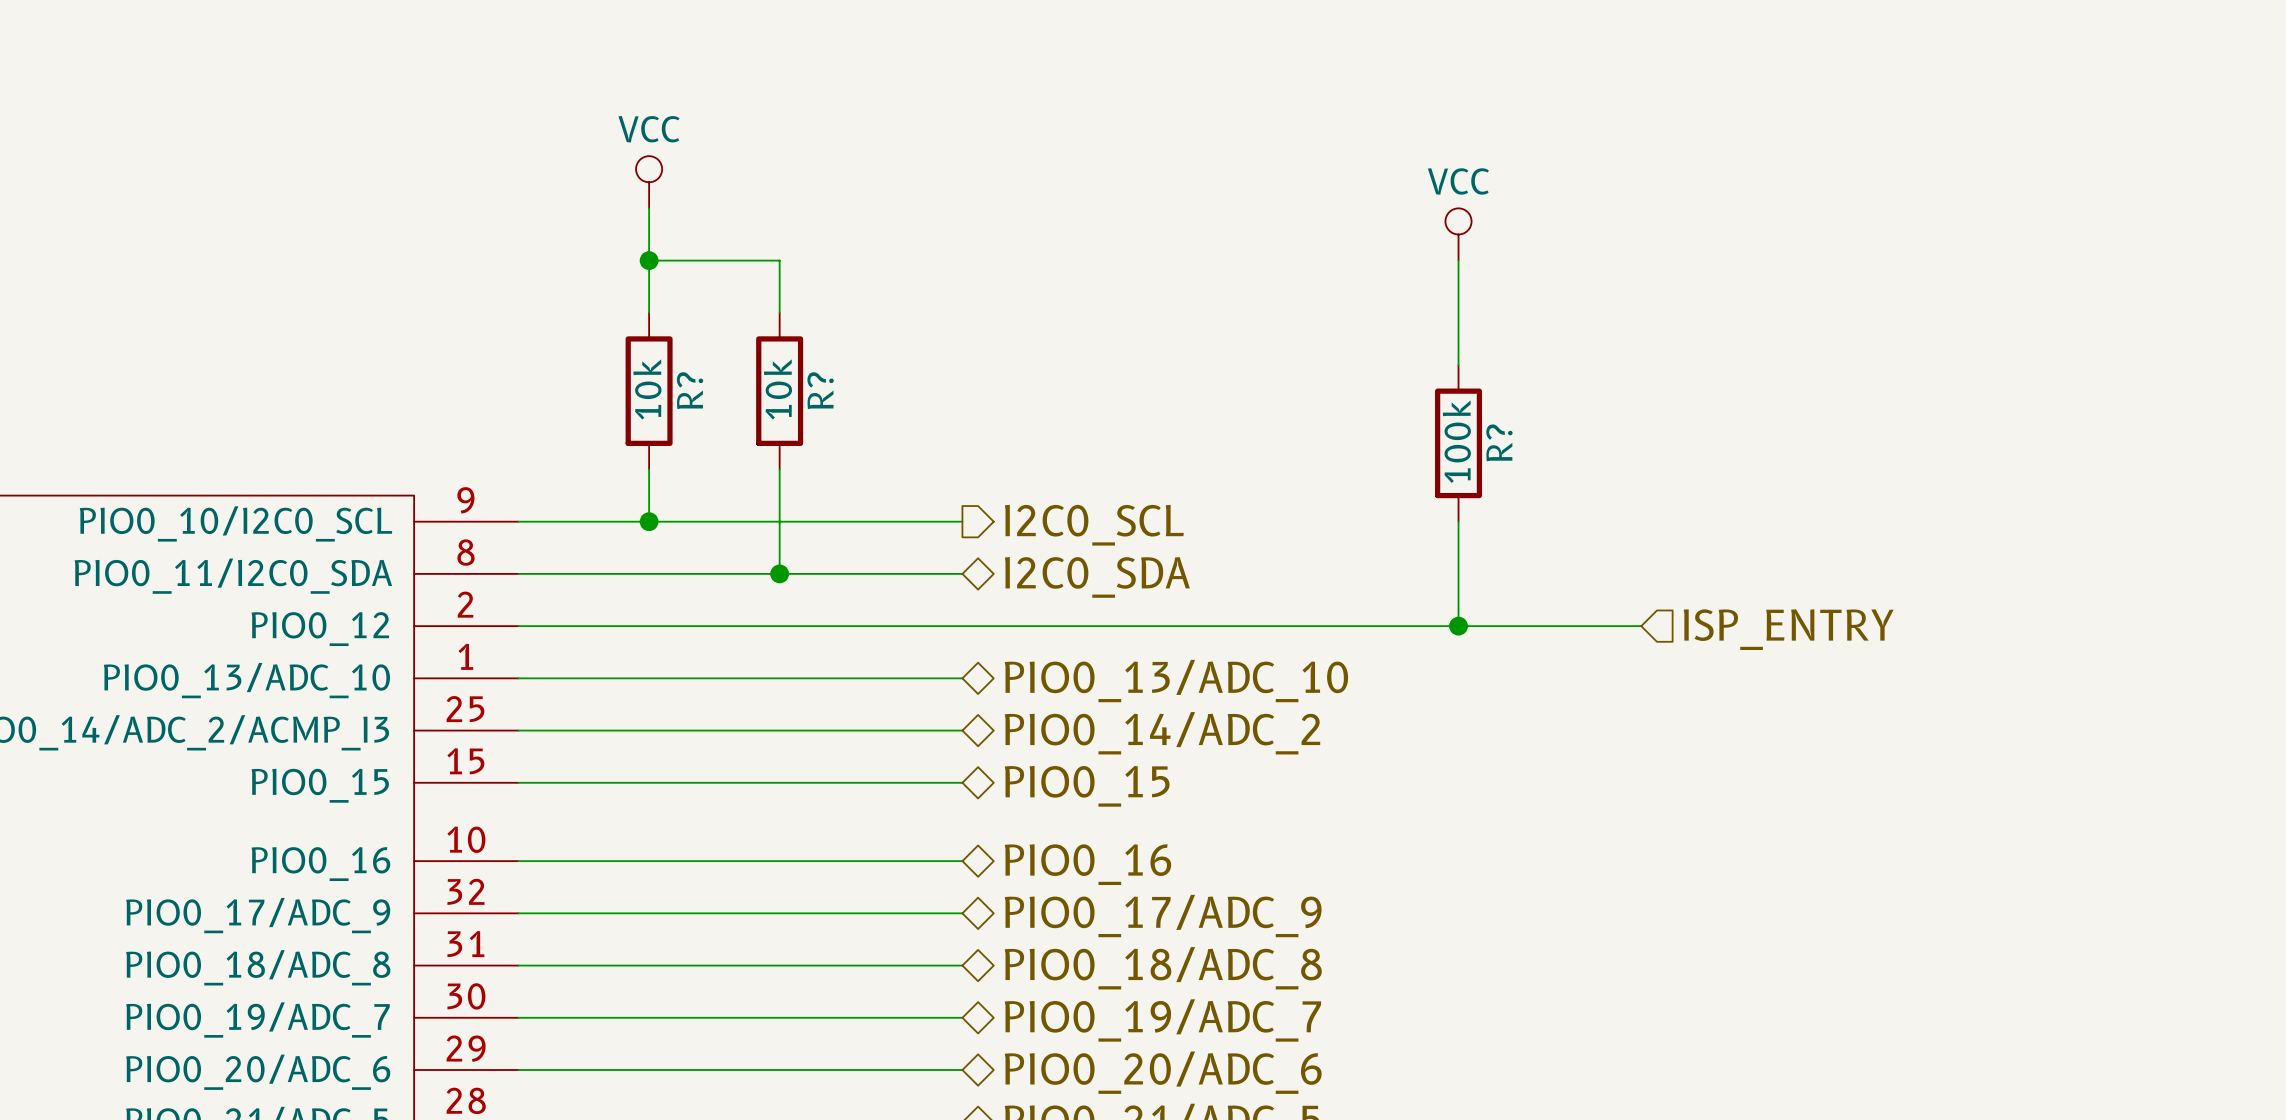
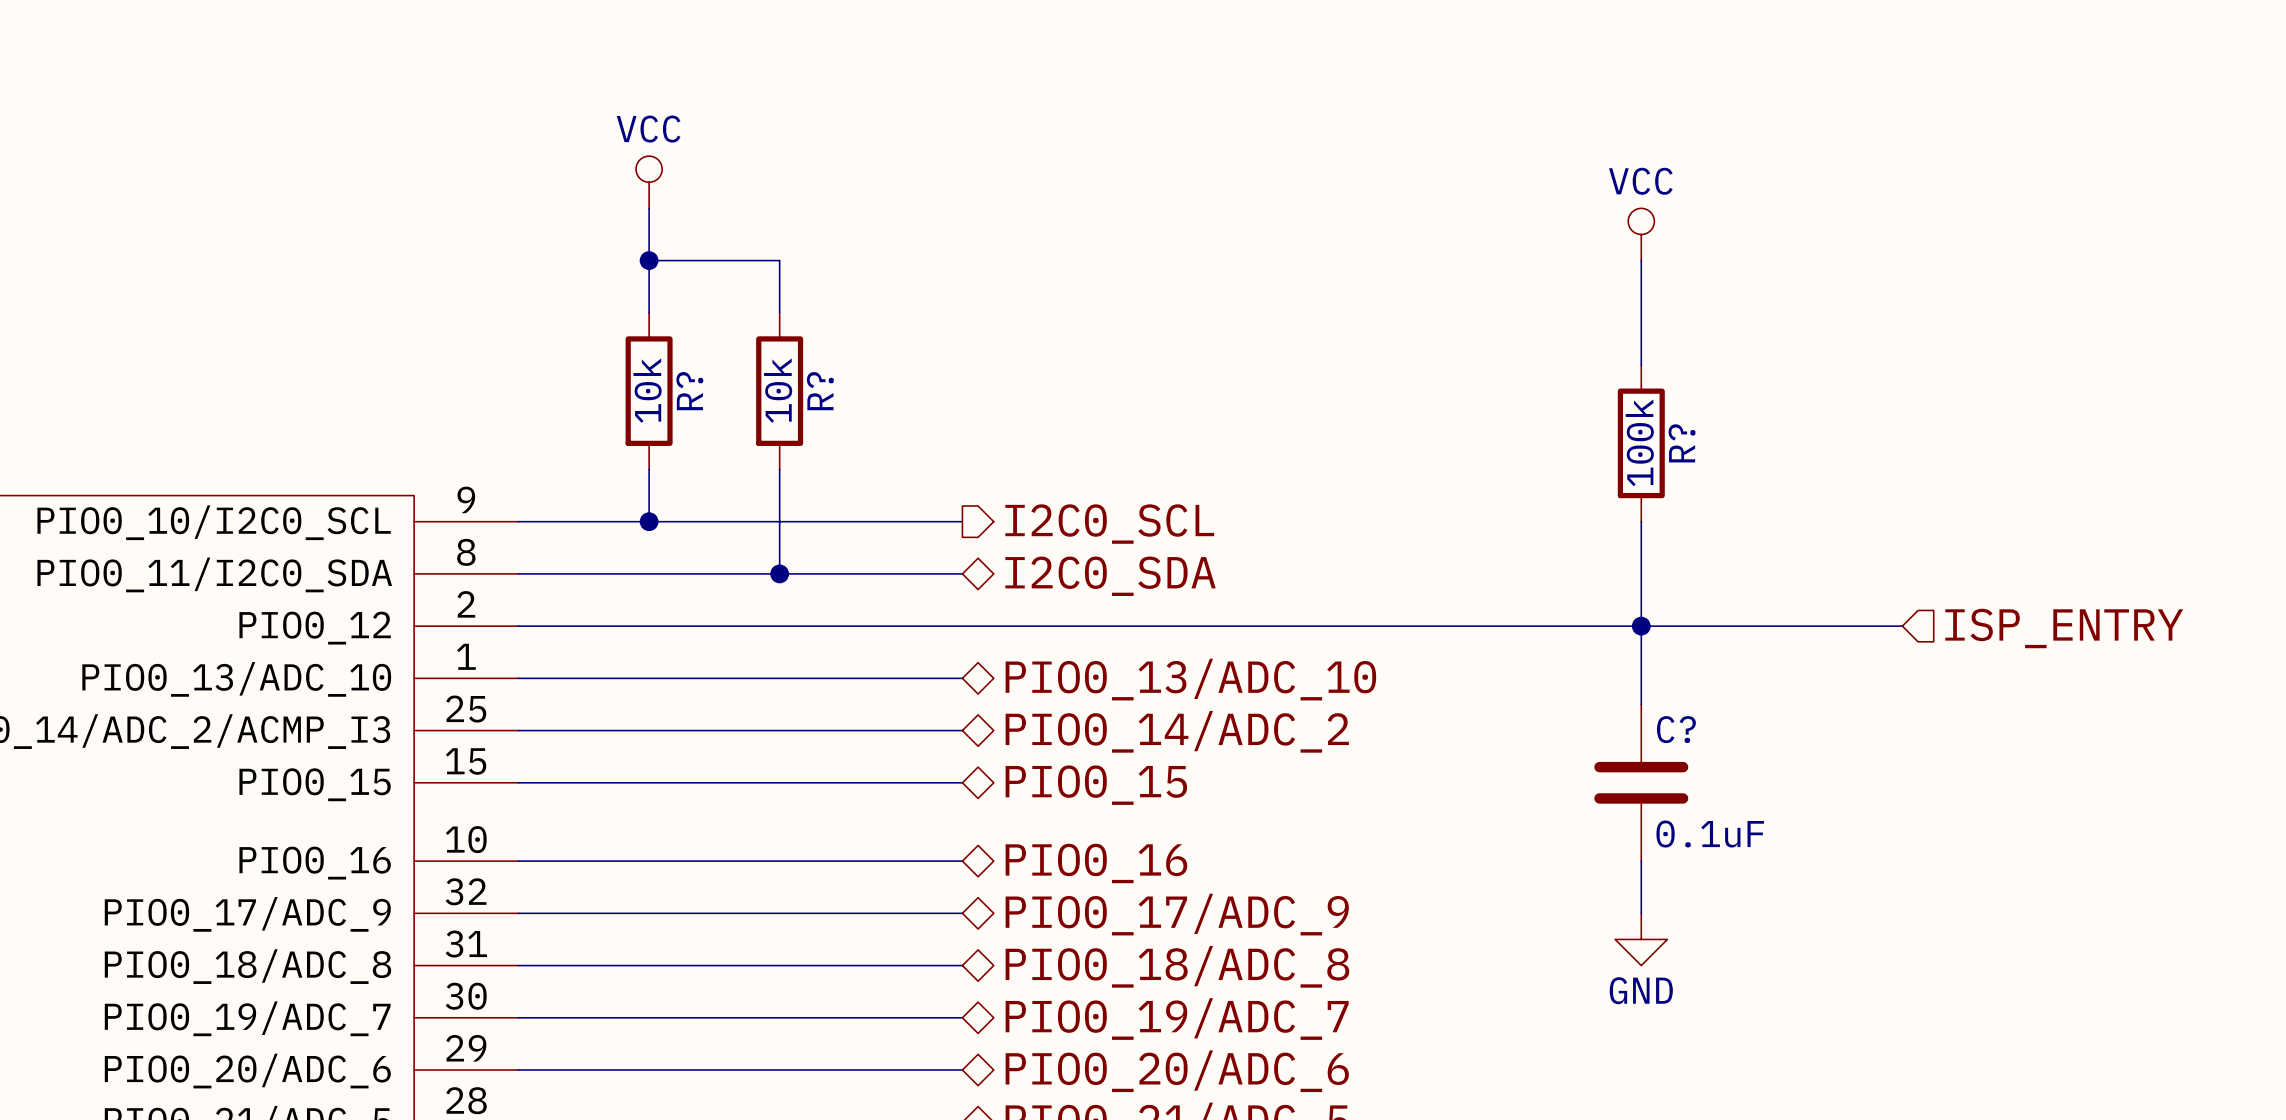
power symbol position: VCC (1458, 234) -> VCC (1641, 234)
wire: (1458, 260) (1458, 365) -> (1641, 260) (1641, 365)
R? position: (1458, 443) -> (1641, 443)
wire: (1458, 521) (1458, 626) -> none
wire: none -> (1641, 521) (1641, 704)
junction: (1458, 626) -> none
wire: none -> (1641, 626) (1902, 626)
junction: none -> (1641, 626)
hierarchical label position: ISP_ENTRY (1788, 629) -> ISP_ENTRY (2064, 628)
C?: none -> 0.1uF (1641, 782)
wire: none -> (1641, 861) (1641, 913)
power symbol: none -> GND (1641, 939)

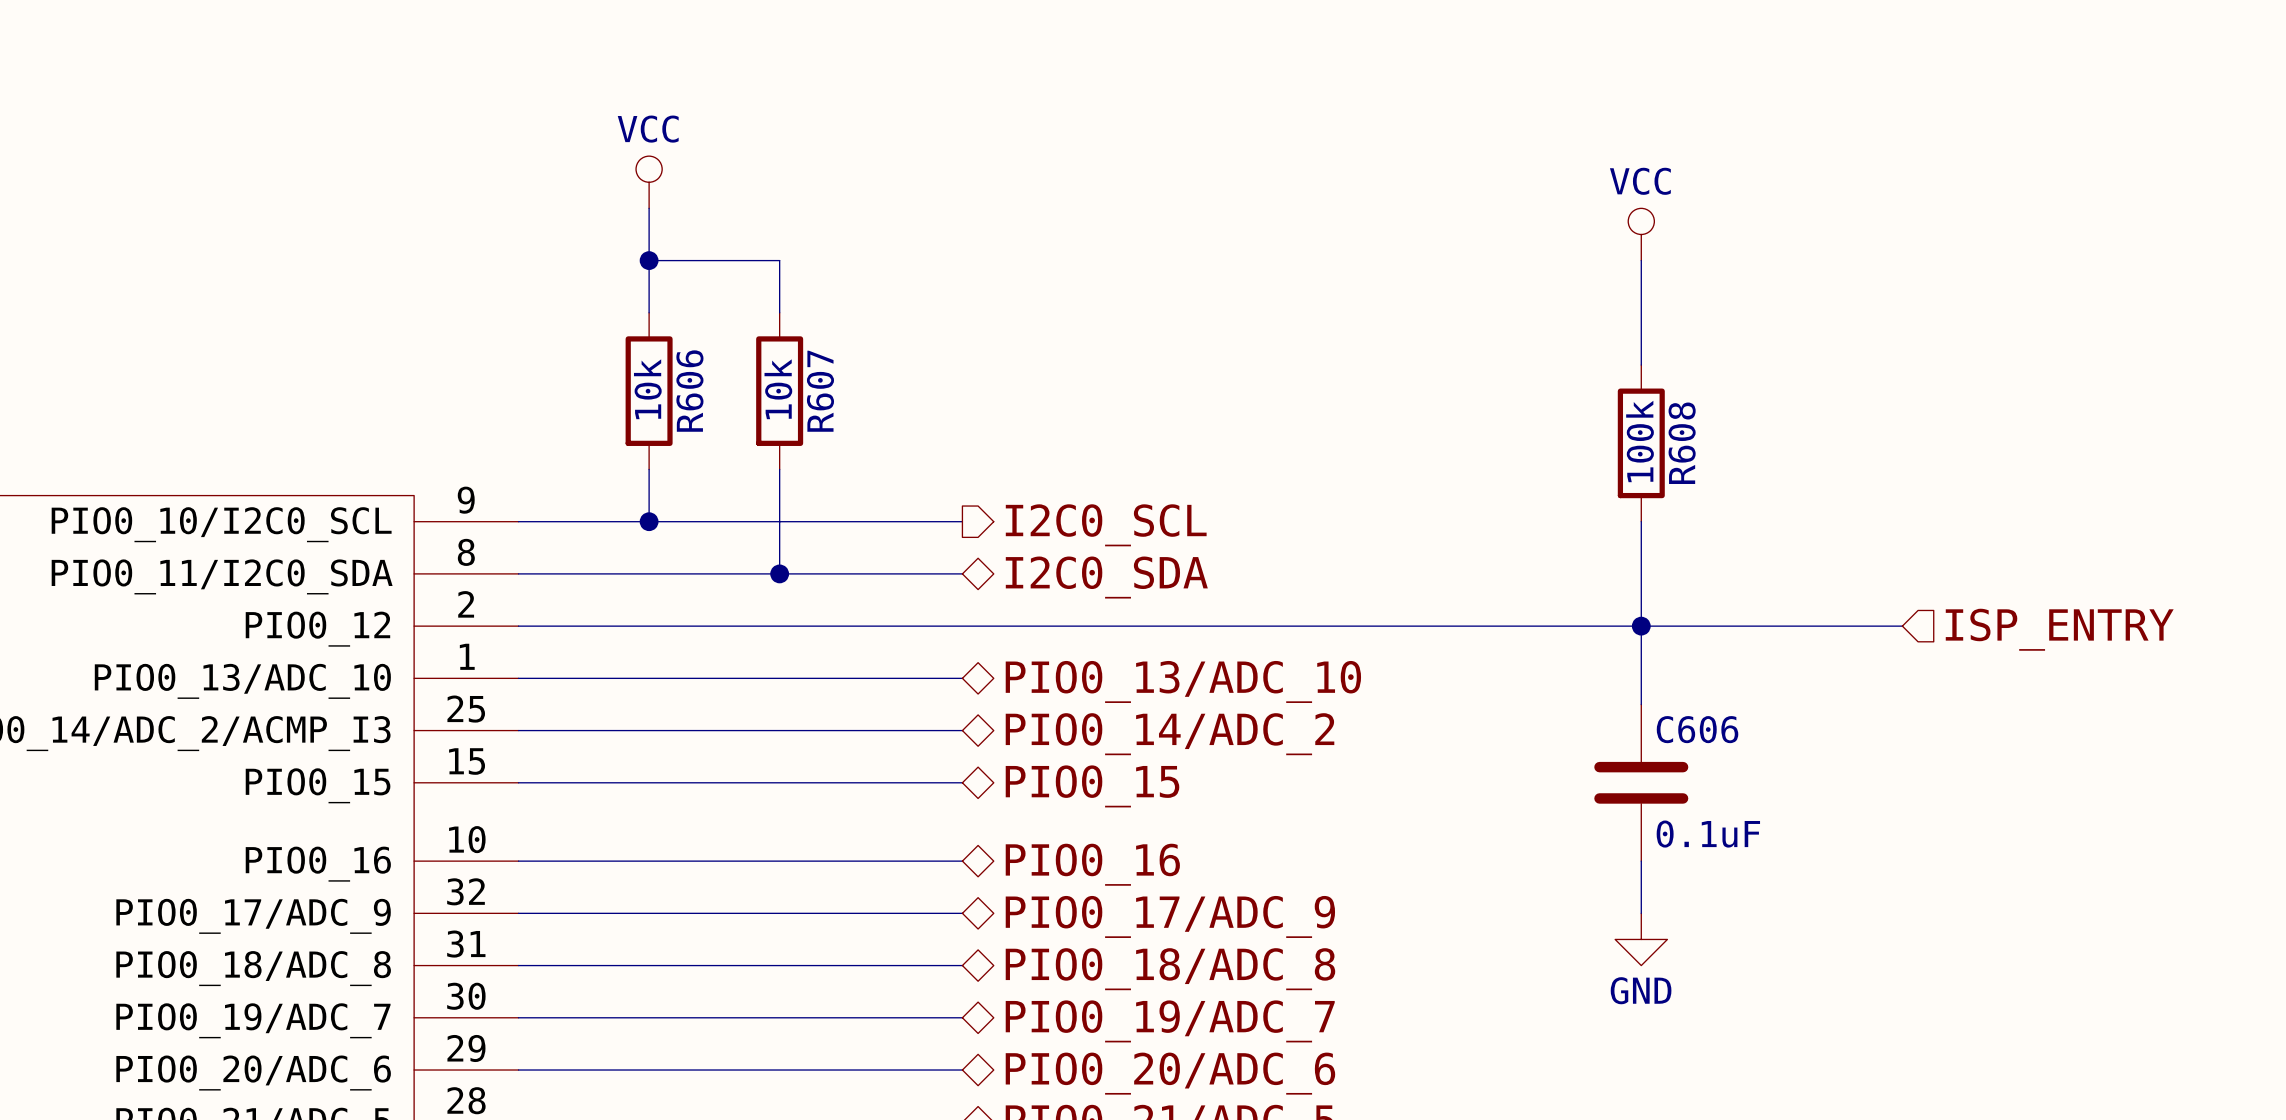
R? name: R? (689, 391) -> R606 (689, 391)
R? name: R? (820, 391) -> R607 (820, 391)
R? name: R? (1682, 443) -> R608 (1682, 443)
C? name: C? (1676, 729) -> C606 (1697, 729)

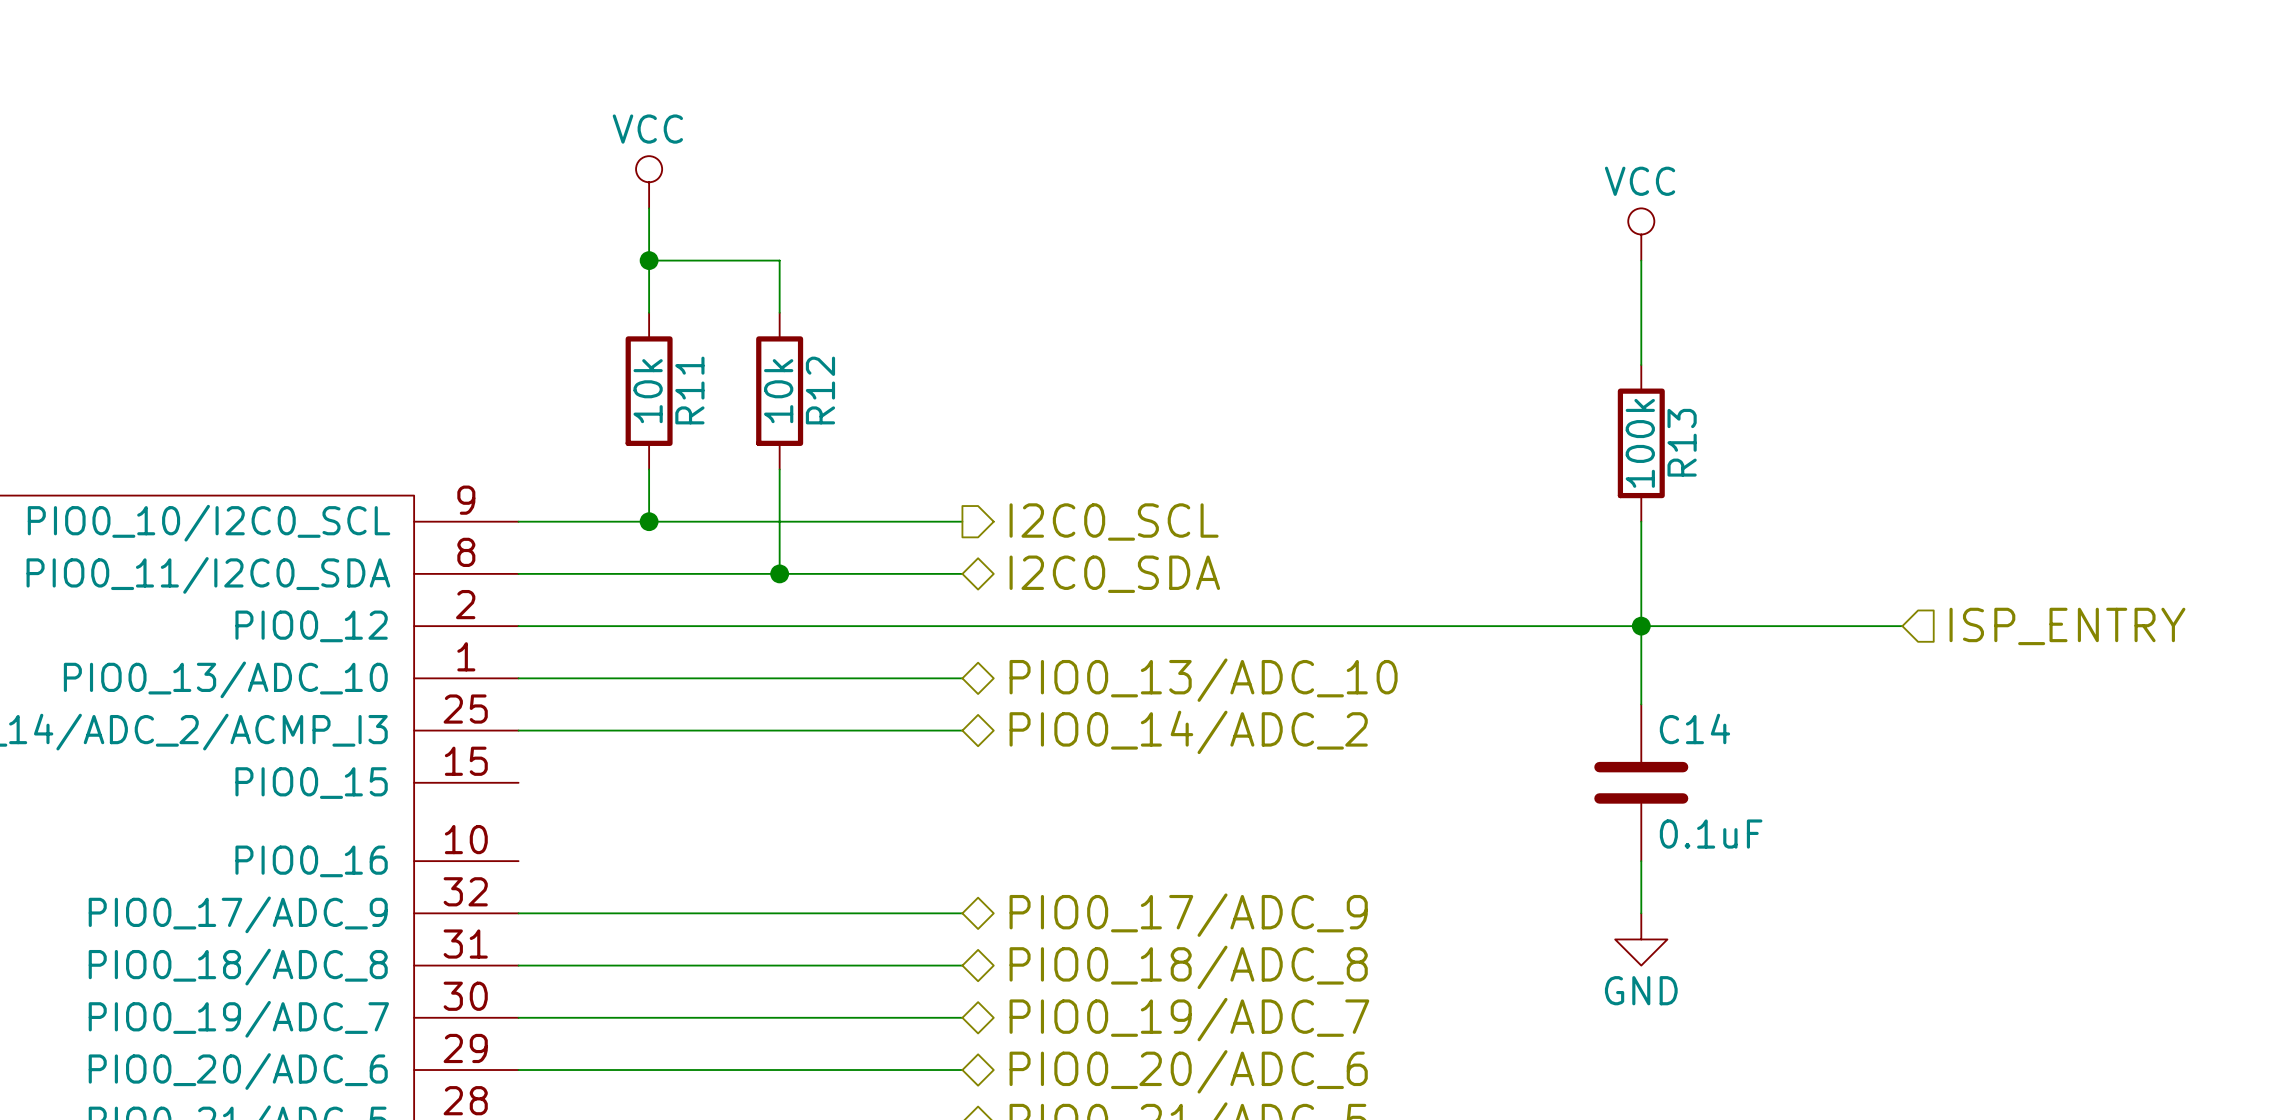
R606 name: R606 (689, 391) -> R11 (689, 390)
R607 name: R607 (820, 391) -> R12 (820, 390)
R608 name: R608 (1682, 443) -> R13 (1682, 442)
C606 name: C606 (1697, 729) -> C14 (1694, 728)
wire: (518, 782) (962, 782) -> none
hierarchical label: PIO0_15 (1092, 786) -> none
wire: (518, 861) (962, 861) -> none
hierarchical label: PIO0_16 (1092, 864) -> none

